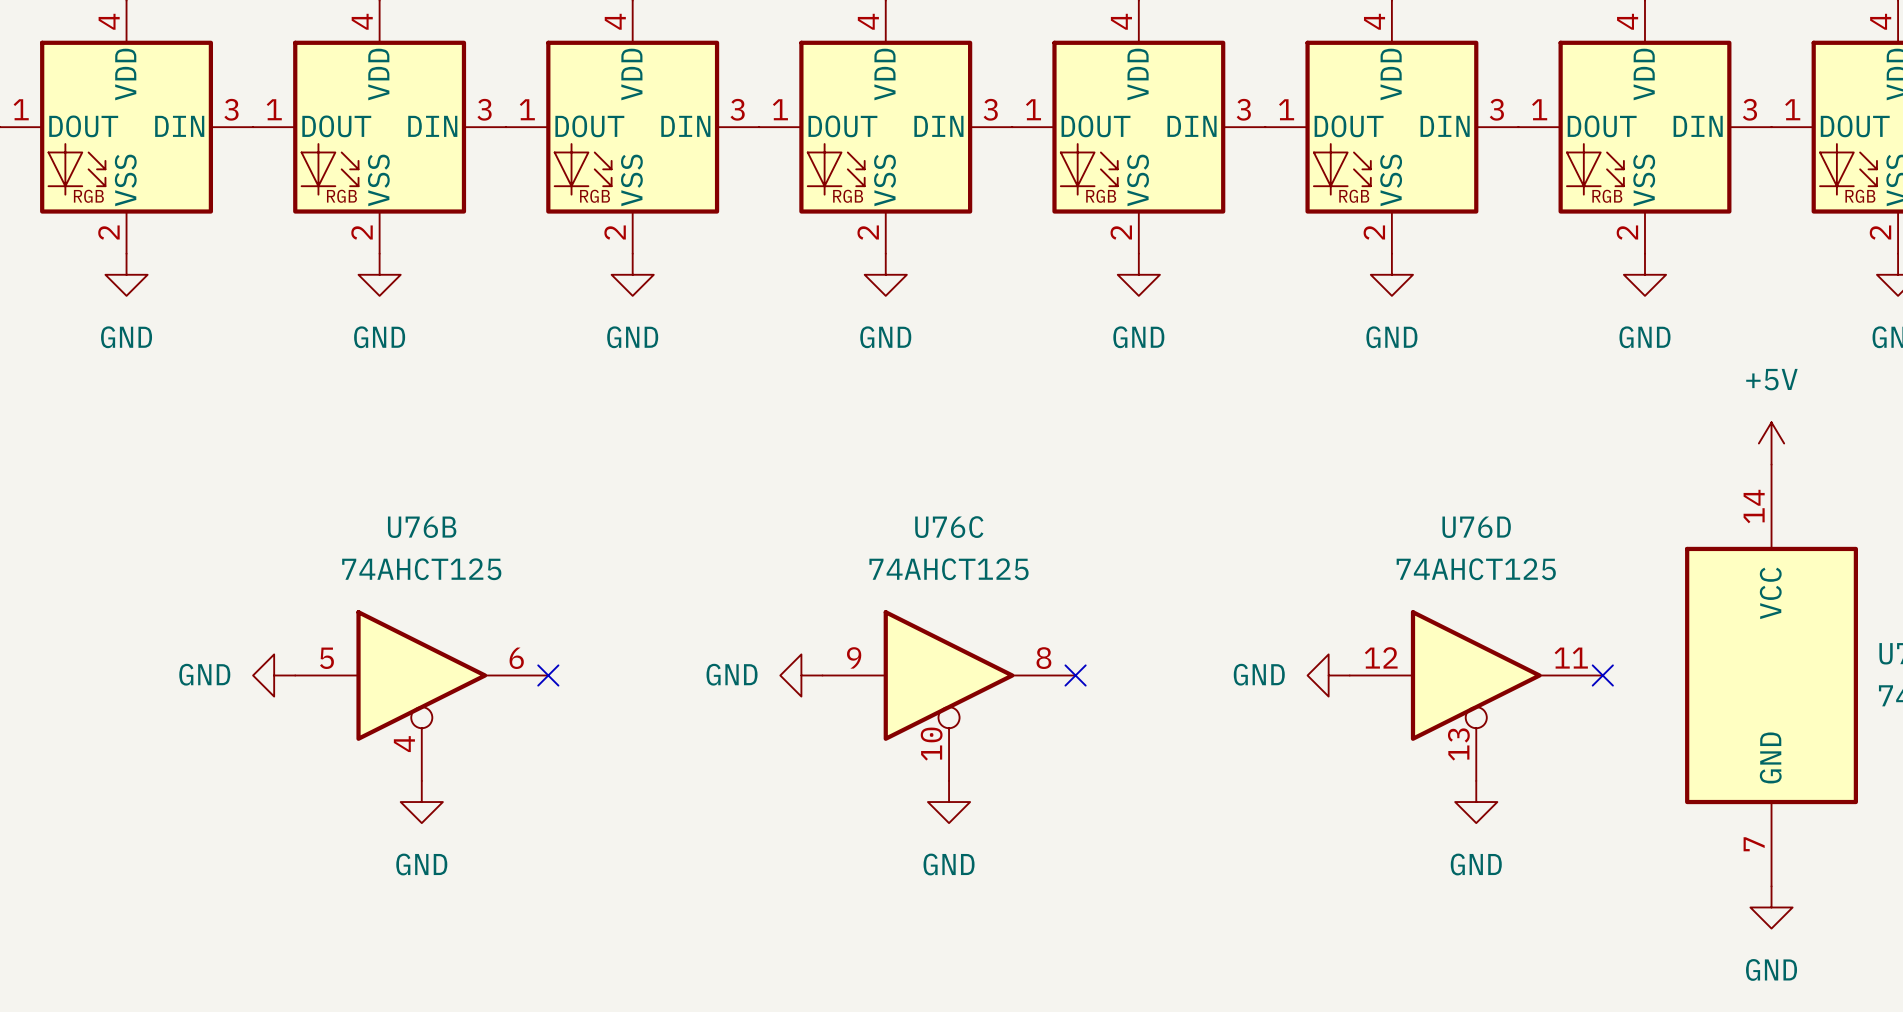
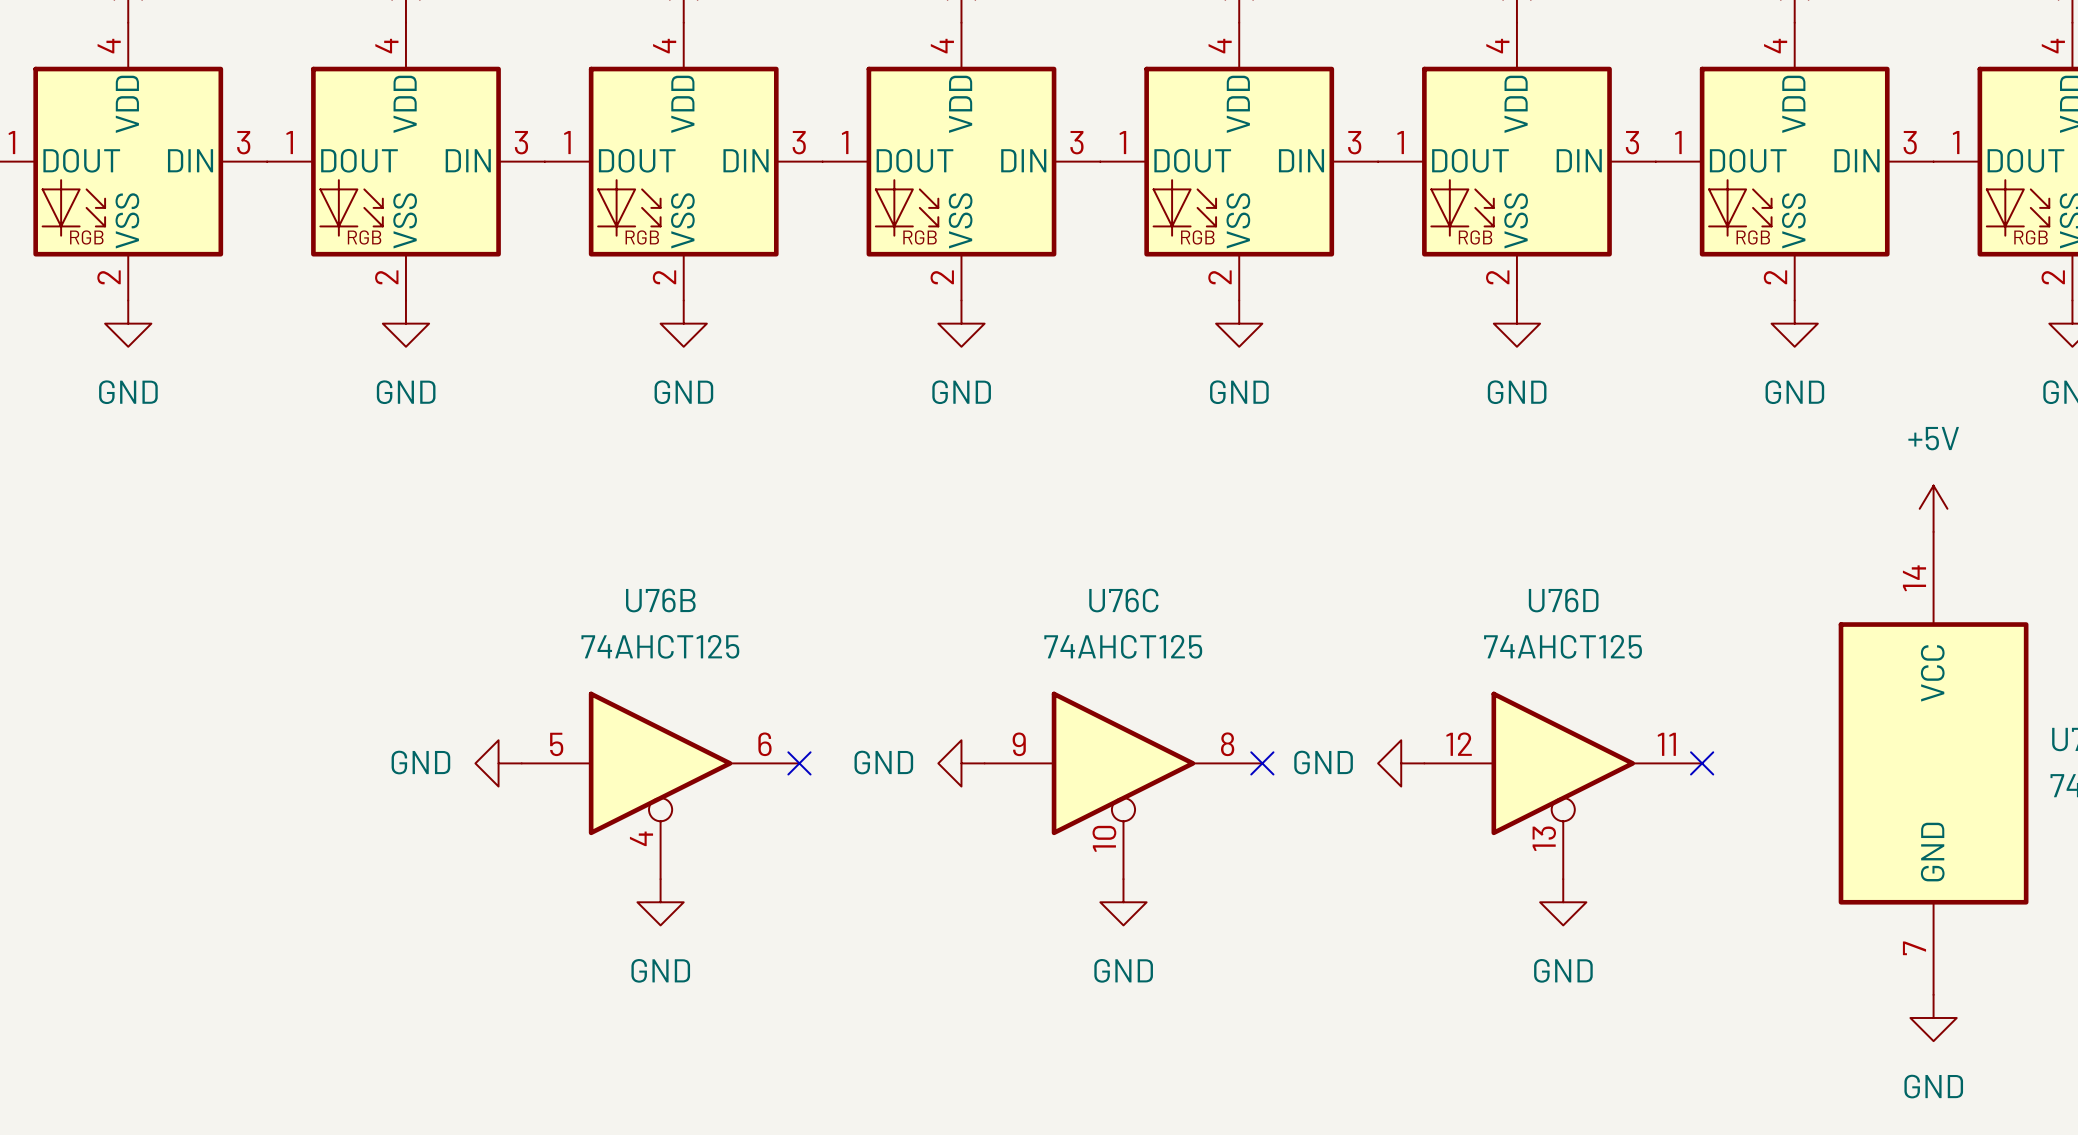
power symbol: GND (274, 675) -> none
power symbol: none -> GND (498, 763)
no-connect mark: (548, 675) -> none
no-connect mark: none -> (799, 763)
power symbol: GND (801, 675) -> none
power symbol: none -> GND (961, 763)
no-connect mark position: (1075, 675) -> (1262, 763)
power symbol position: GND (1328, 675) -> GND (1401, 763)
no-connect mark position: (1602, 675) -> (1702, 763)
U76B position: (421, 695) -> (660, 785)
U76C position: (949, 695) -> (1123, 785)
U76D position: (1476, 695) -> (1563, 785)
power symbol: GND (421, 802) -> none
power symbol: none -> GND (660, 902)
power symbol: GND (949, 802) -> none
power symbol: none -> GND (1123, 902)
power symbol position: GND (1476, 802) -> GND (1563, 902)

